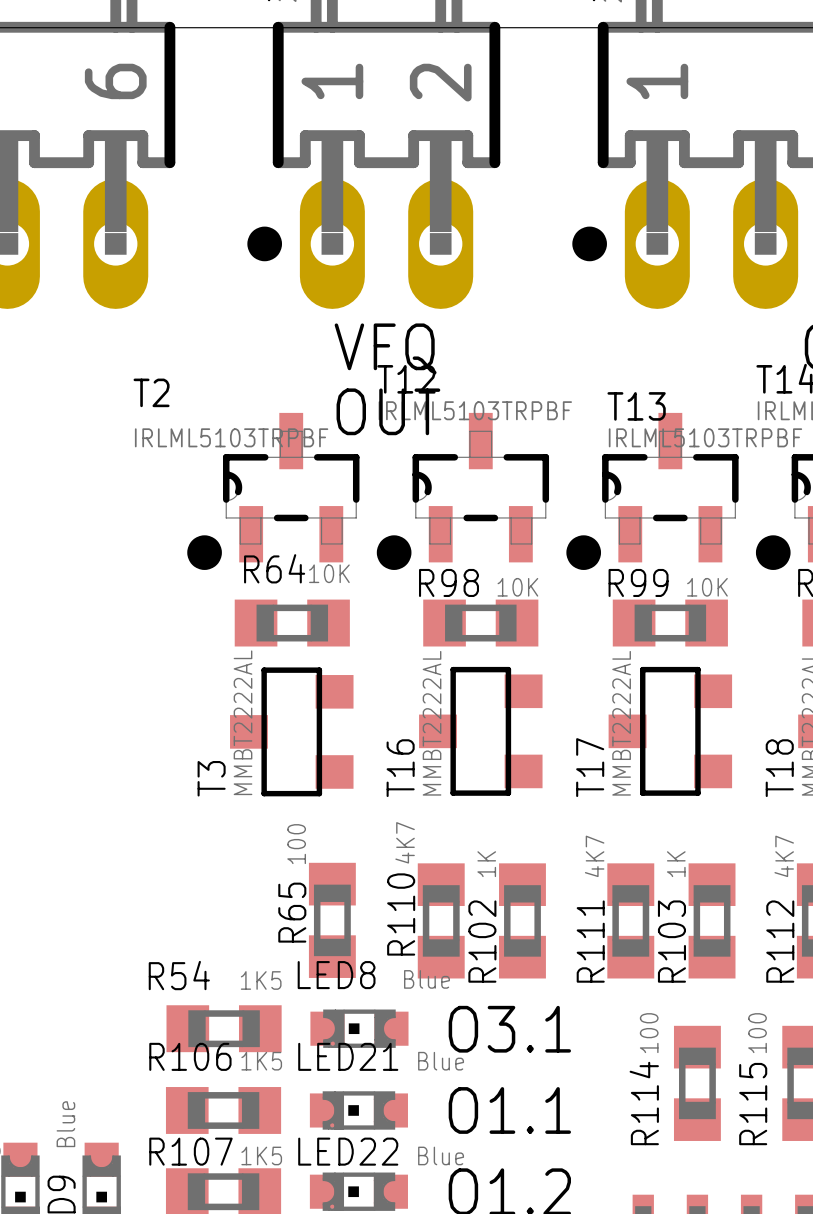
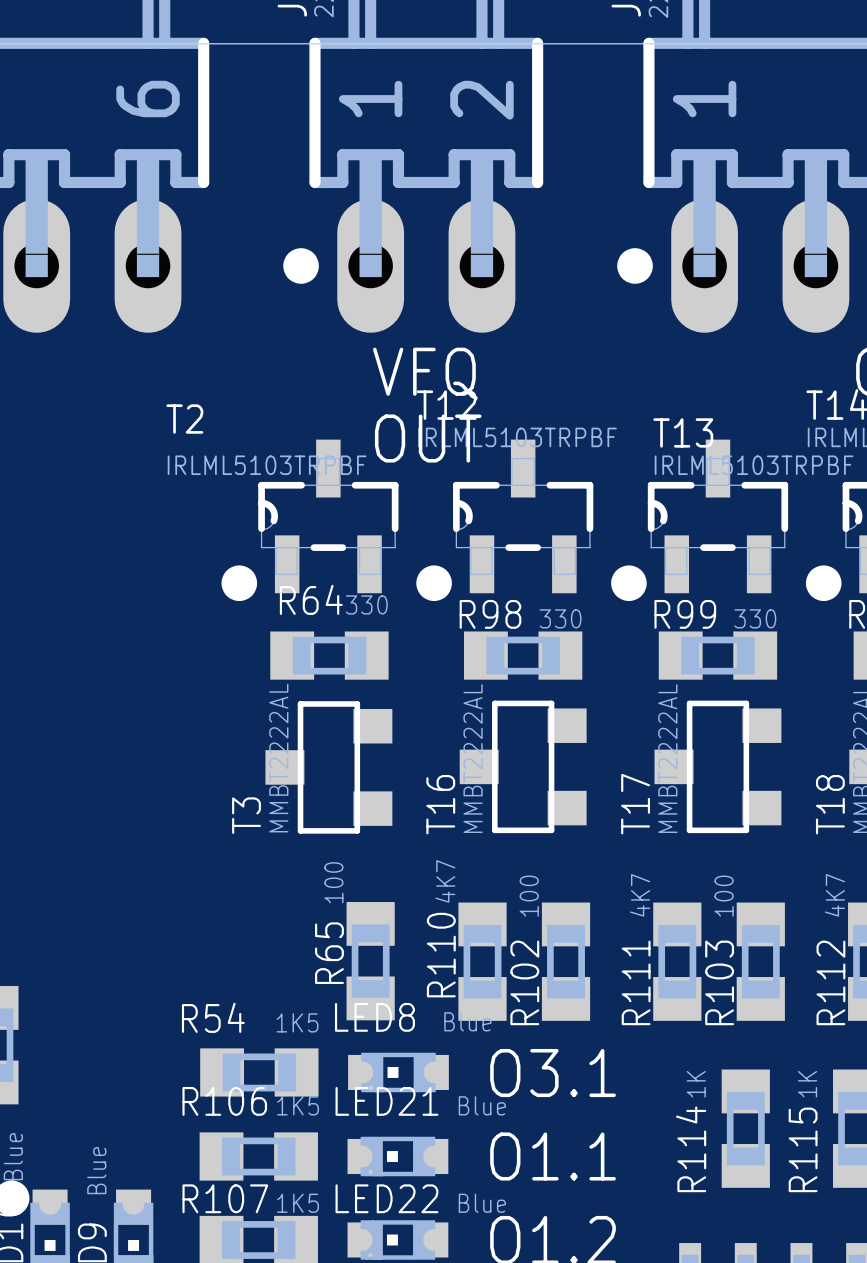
R64 value: 10K (329, 573) -> 330 (366, 604)
R98 value: 10K (517, 587) -> 330 (560, 618)
R99 value: 10K (707, 587) -> 330 (755, 618)
R102 value: 1K (486, 864) -> 100 (529, 896)
R103 value: 1K (676, 864) -> 100 (724, 896)
R114 value: 100 (649, 1033) -> 1K (696, 1084)
R115 value: 100 (757, 1033) -> 1K (807, 1084)

